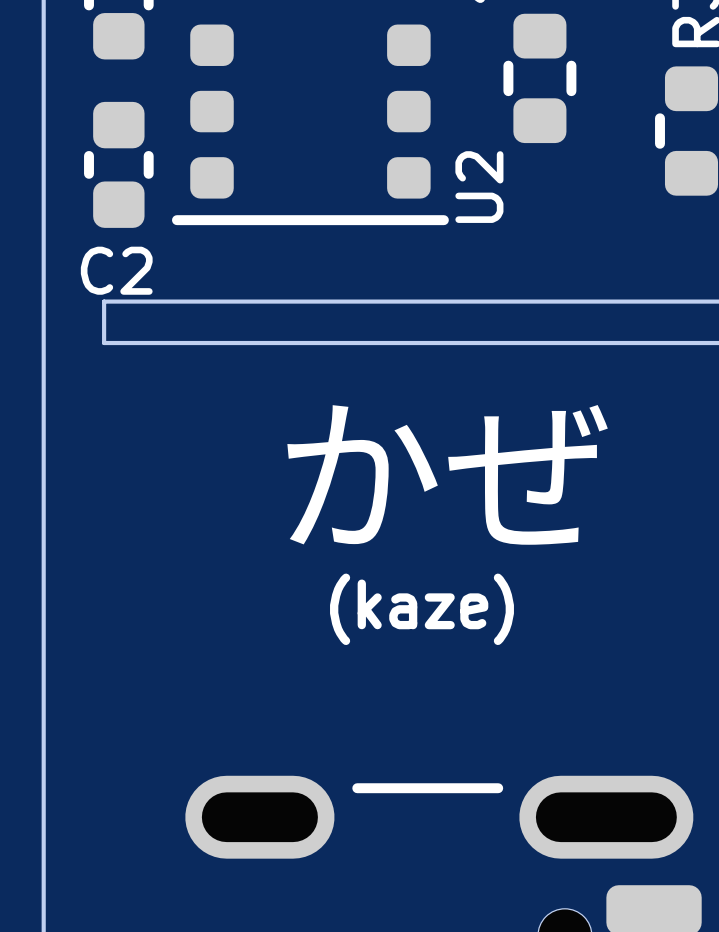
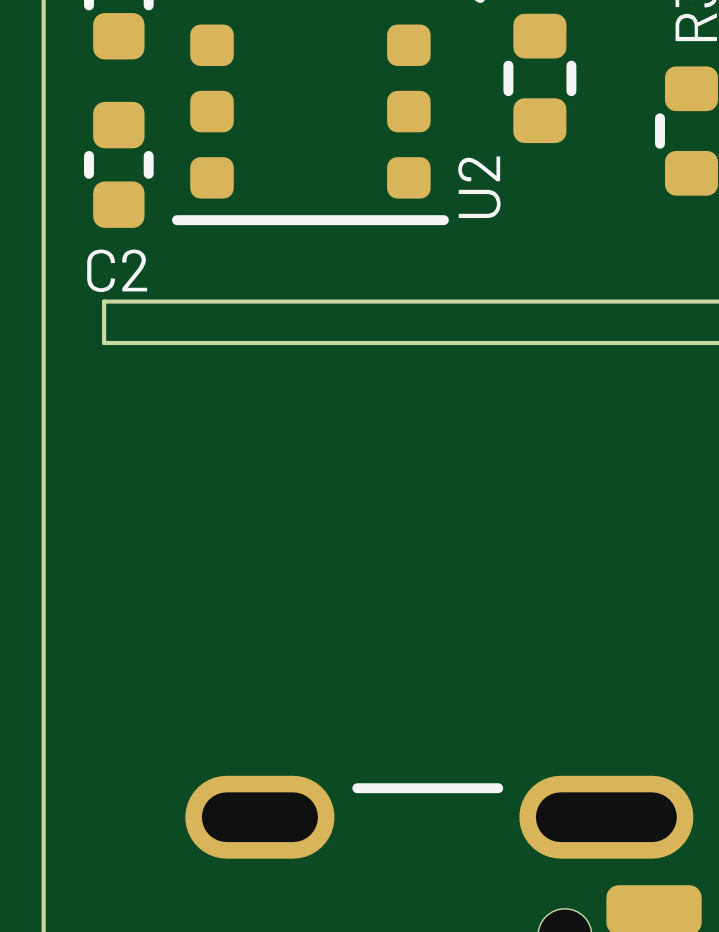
text: かぜ (447, 474) -> none
text: (kaze) (421, 609) -> none

